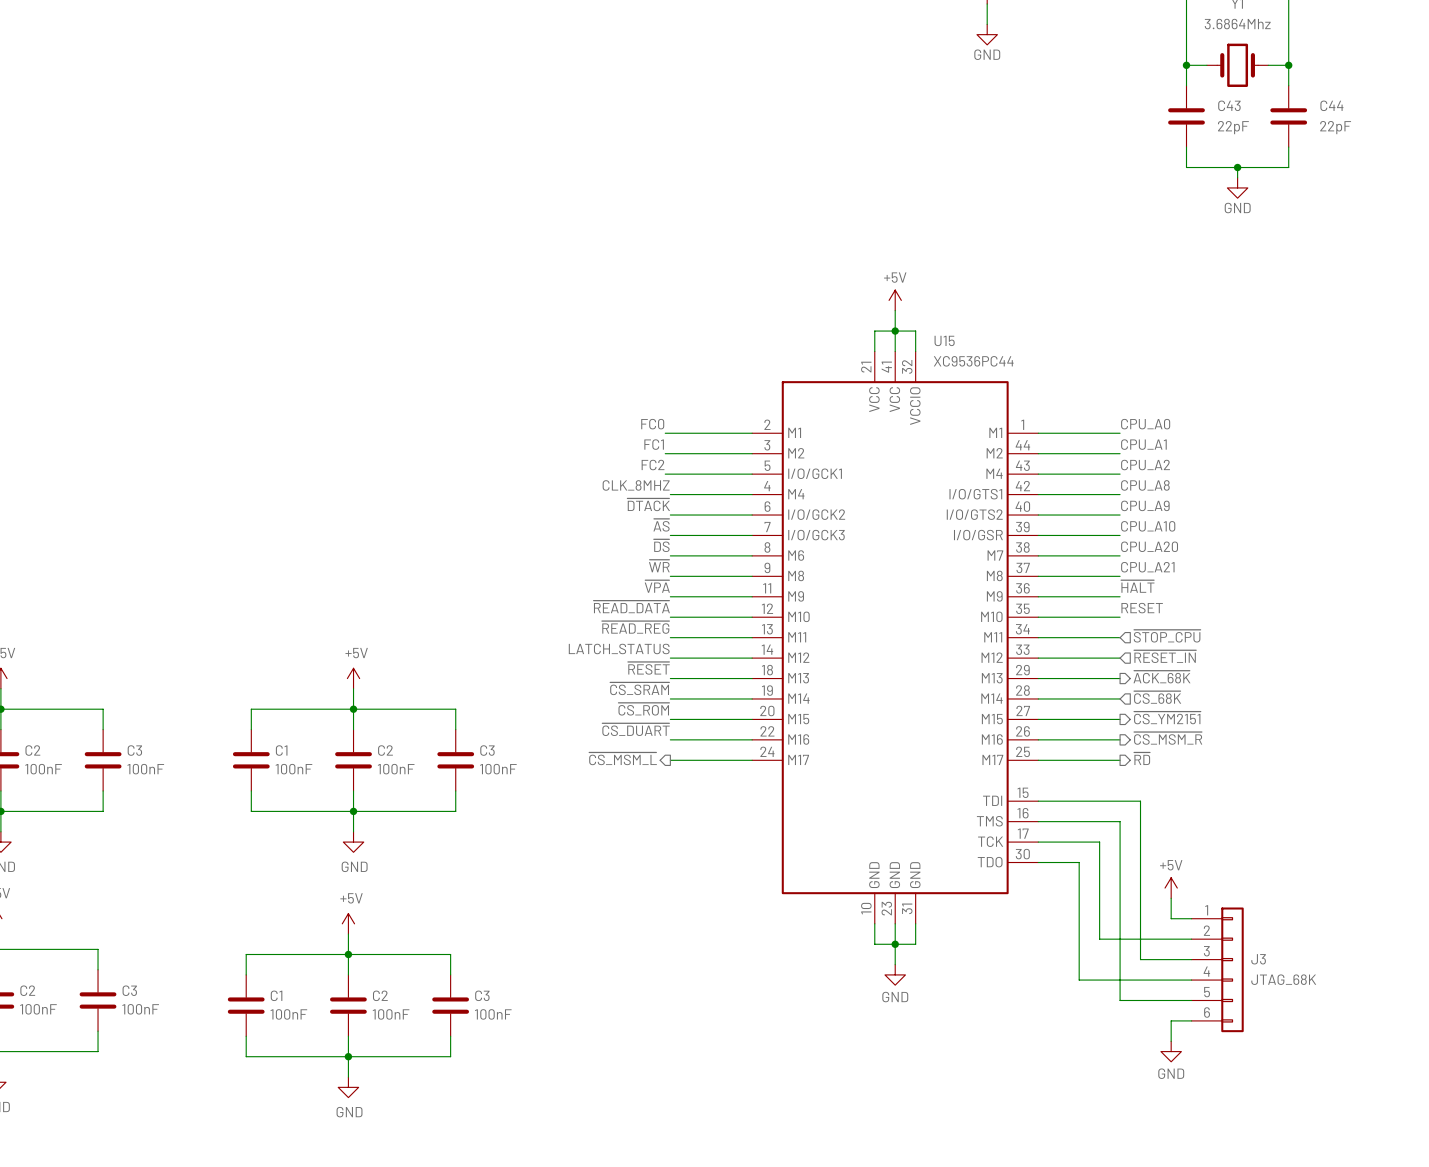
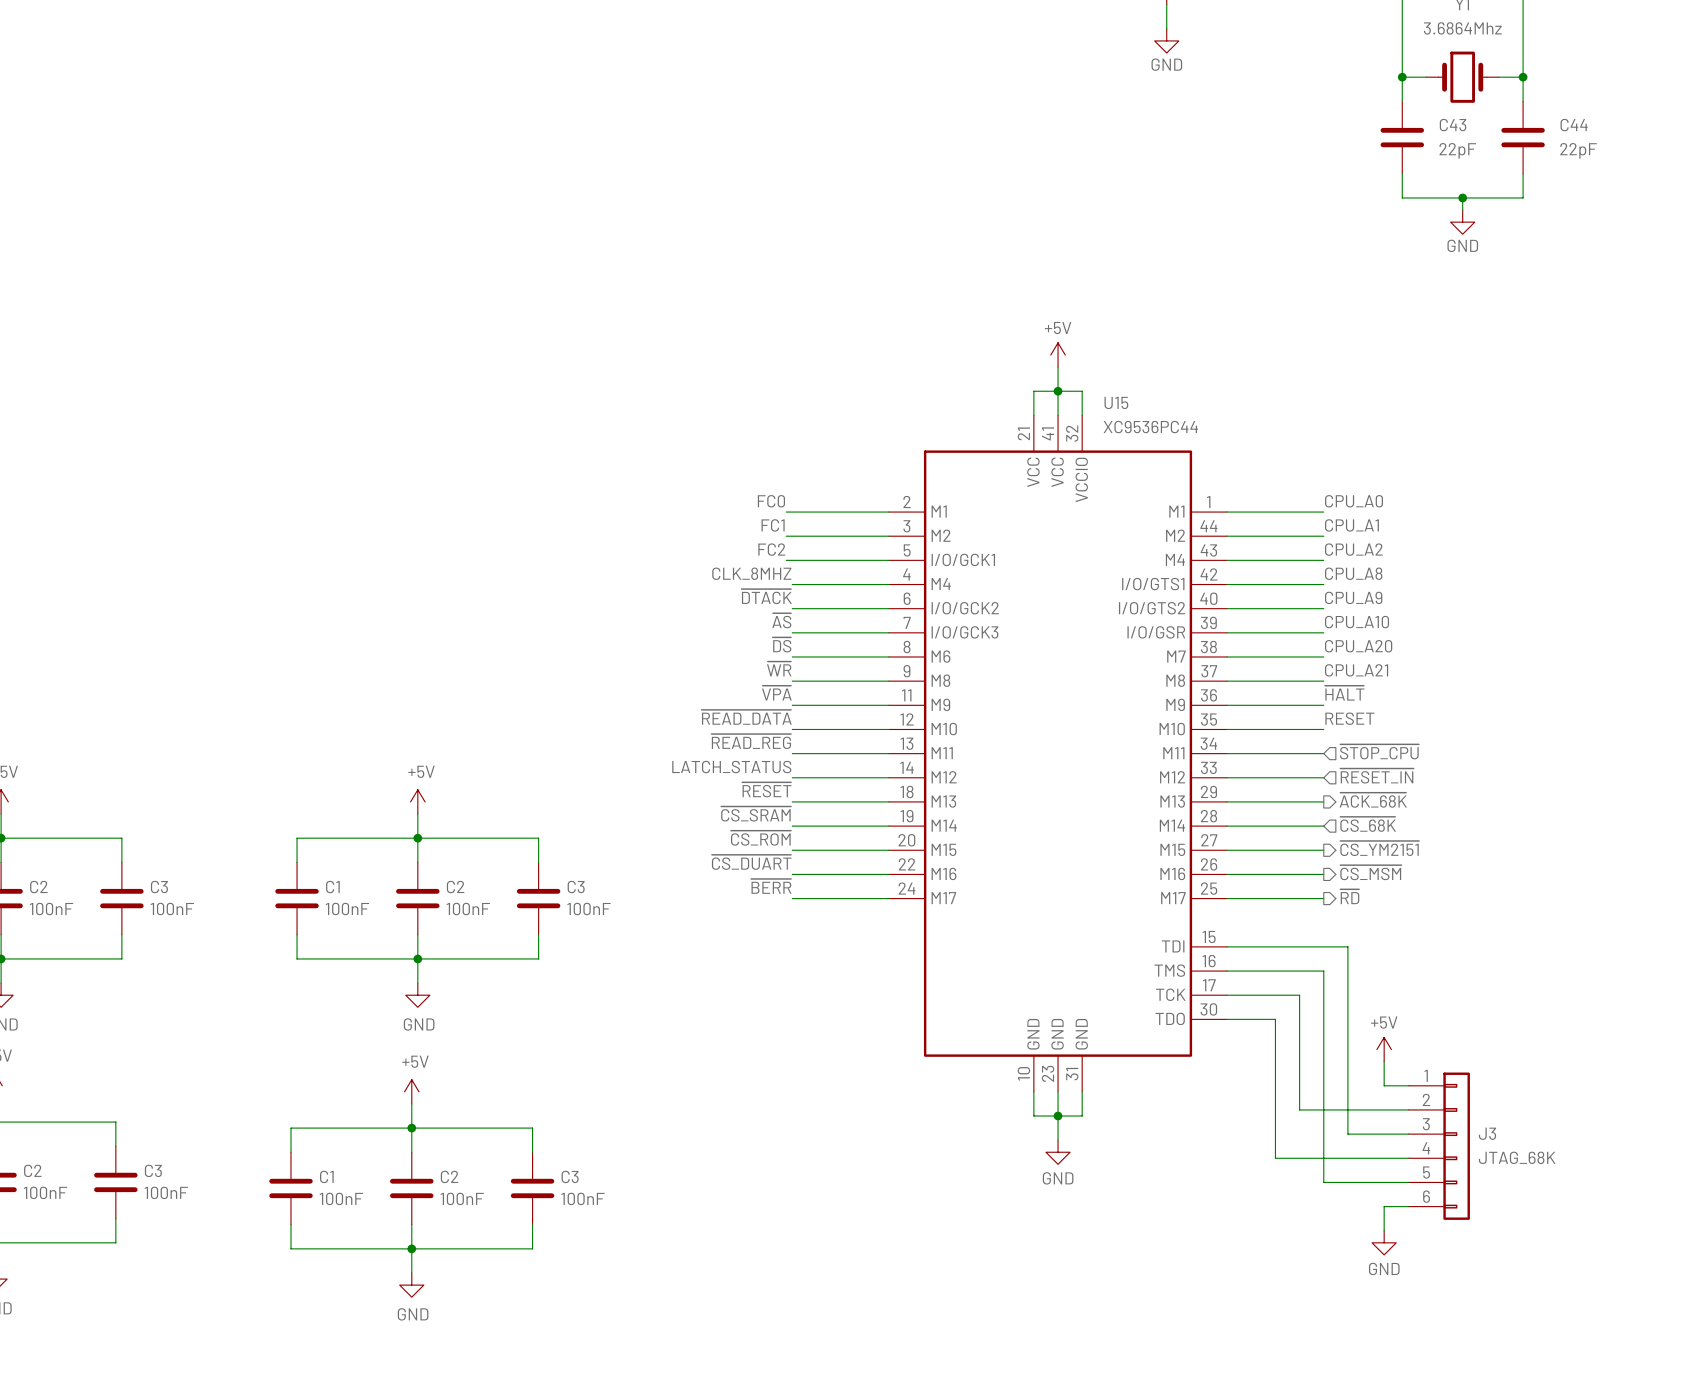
hierarchical label: ~{CS_MSM_R} (1168, 738) -> ~{CS_MSM} (1370, 872)
label: none -> ~{BERR} (771, 886)
hierarchical label: ~{CS_MSM_L} (623, 758) -> none

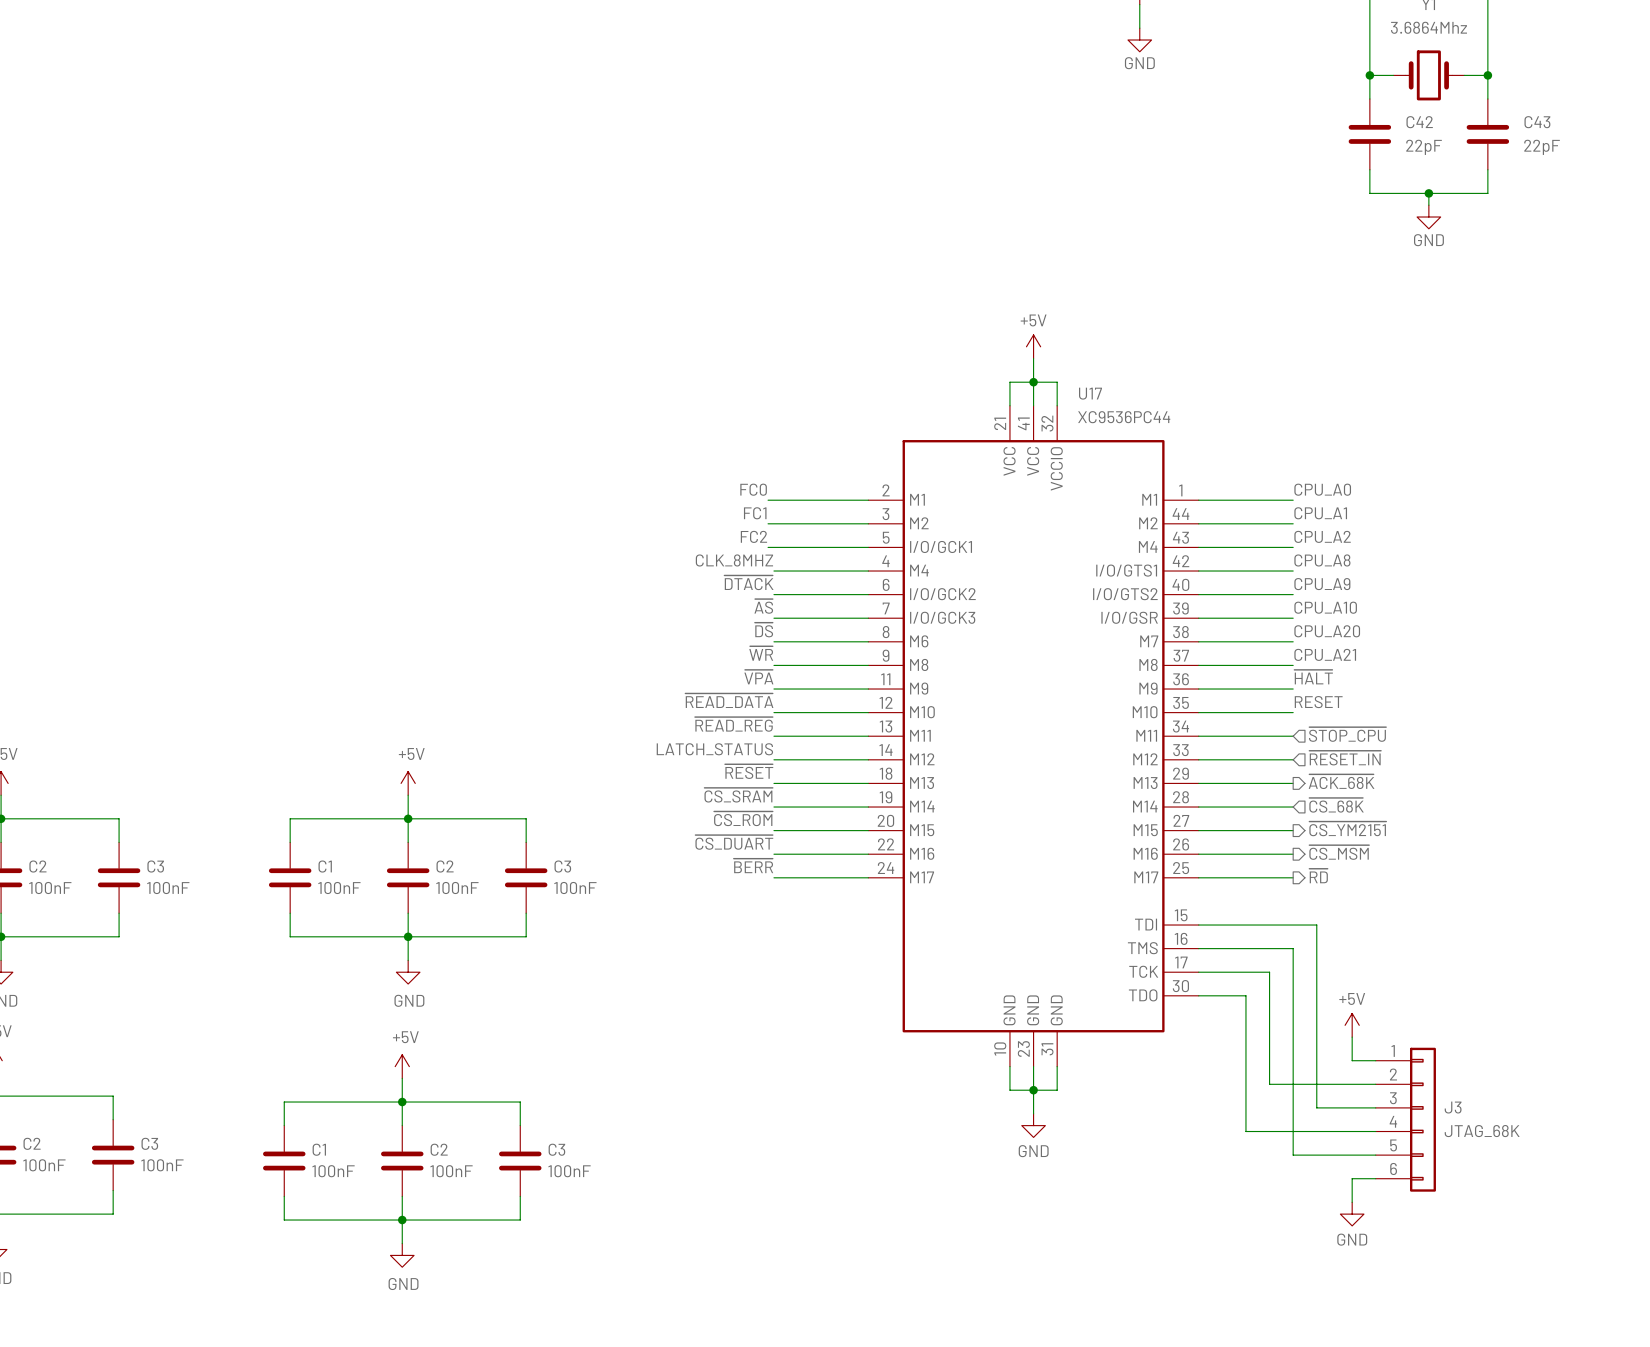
C43 name: C43 (1453, 125) -> C42 (1419, 122)
C44 name: C44 (1574, 125) -> C43 (1537, 122)
U15 name: U15 (1116, 402) -> U17 (1090, 393)

